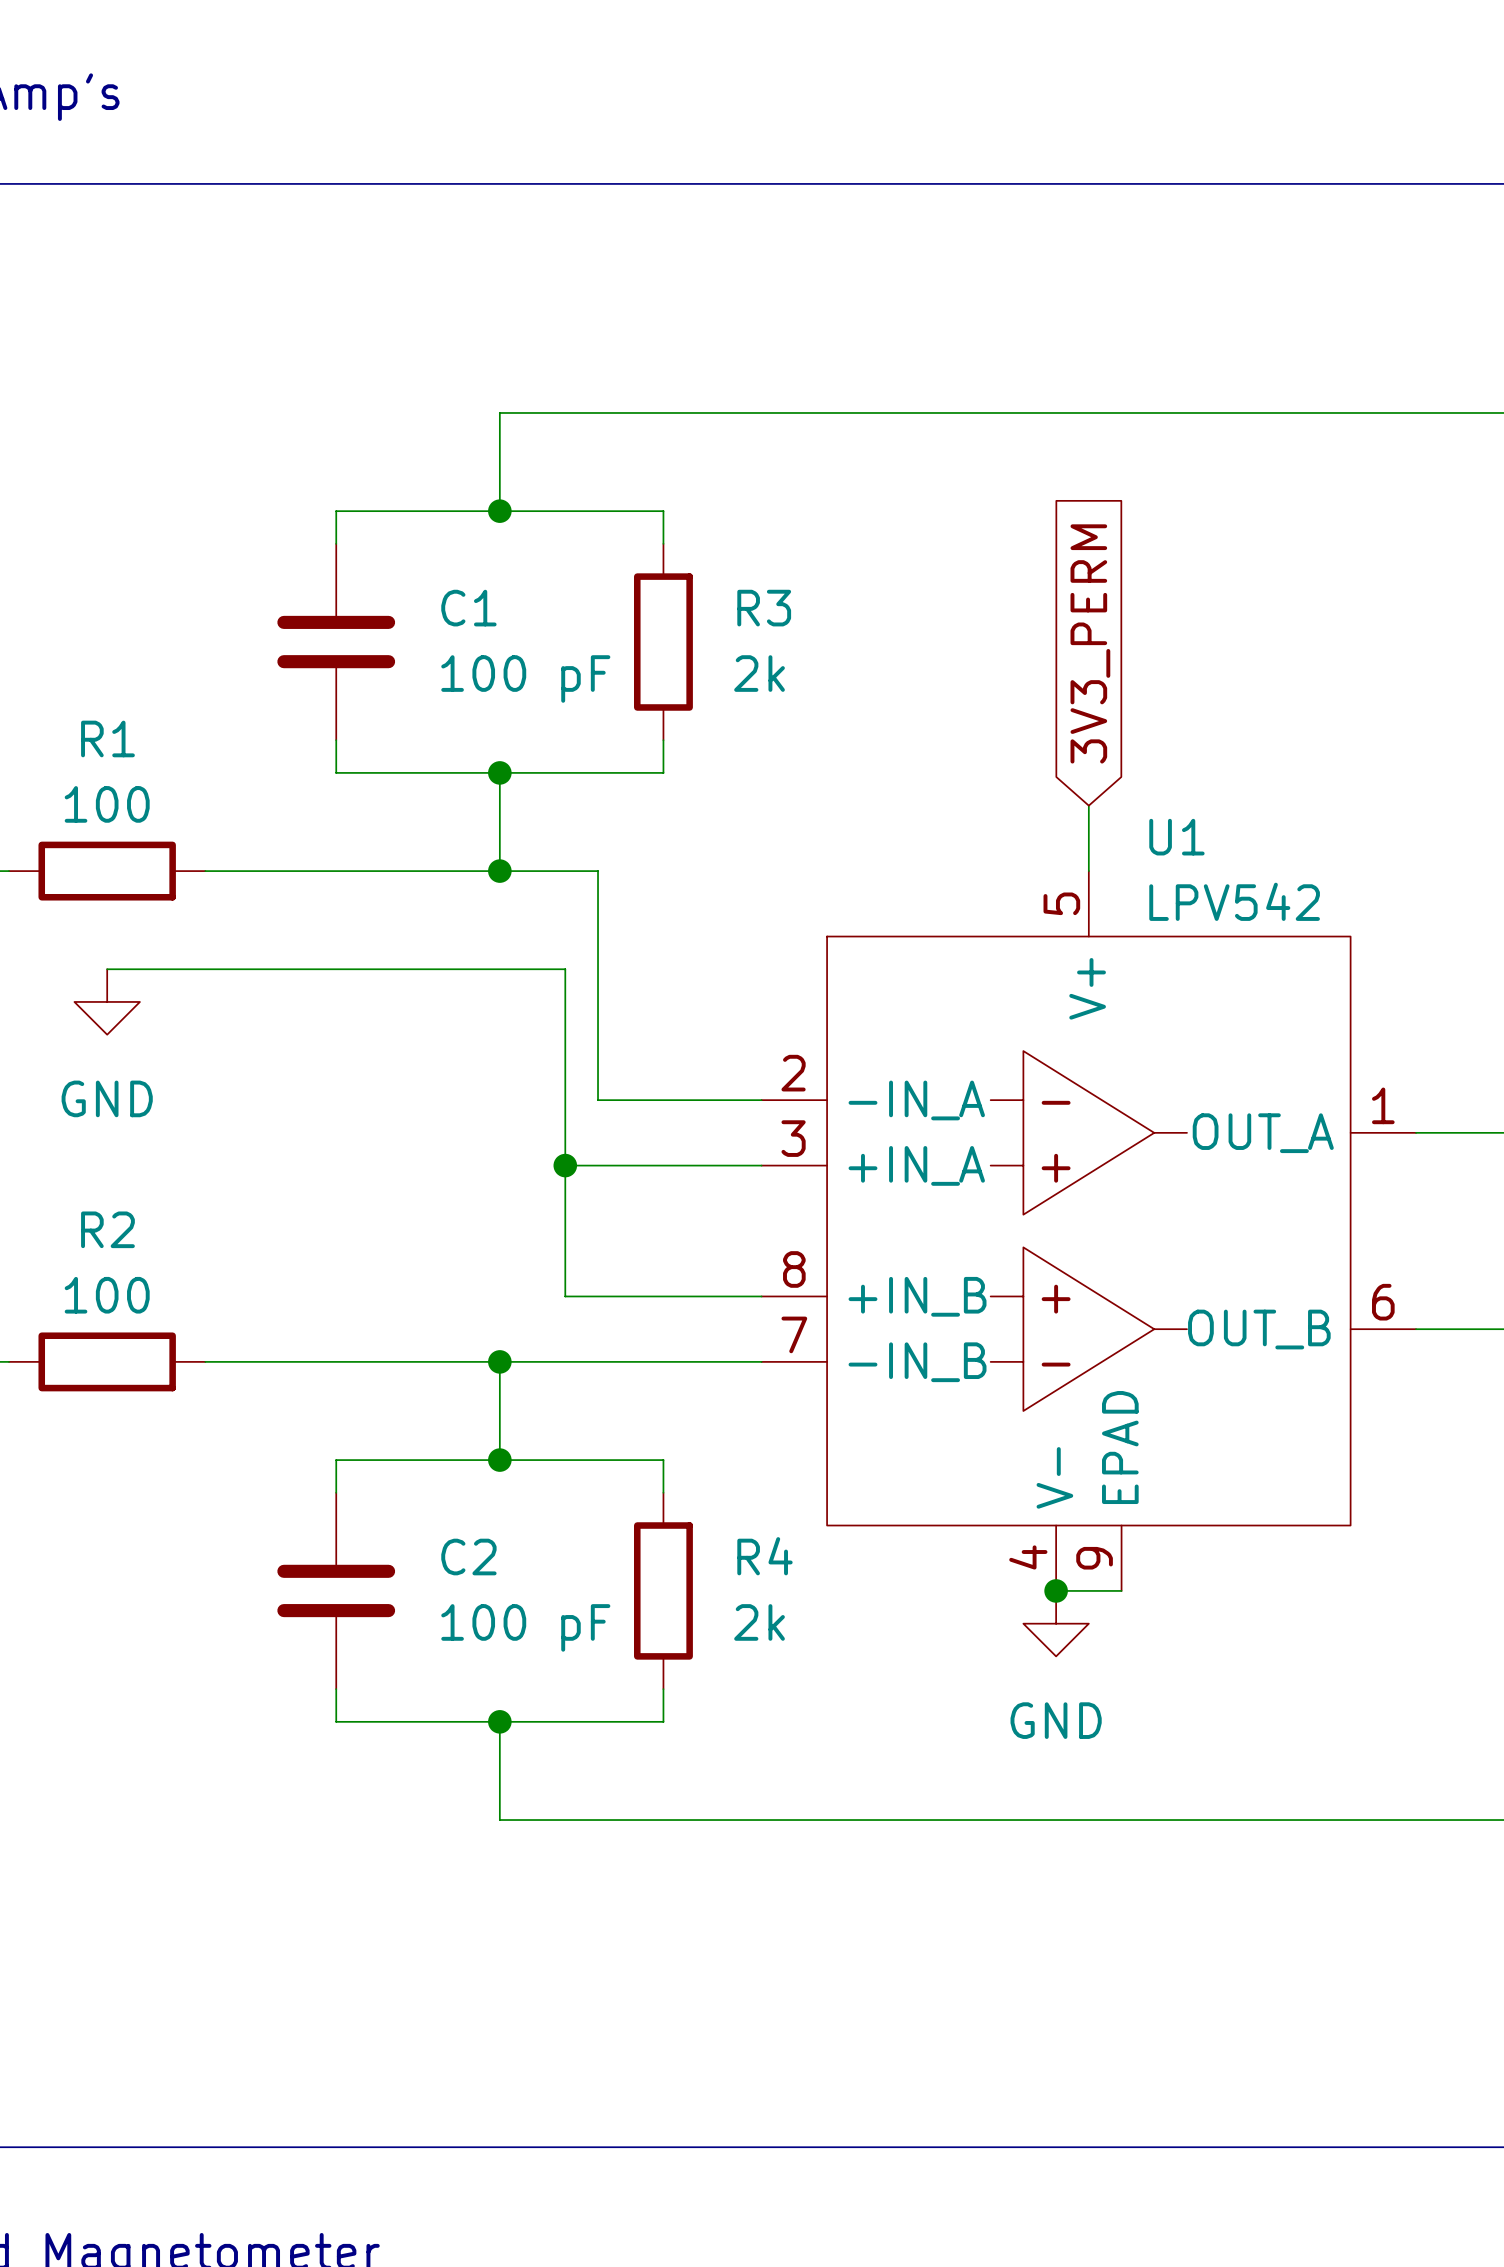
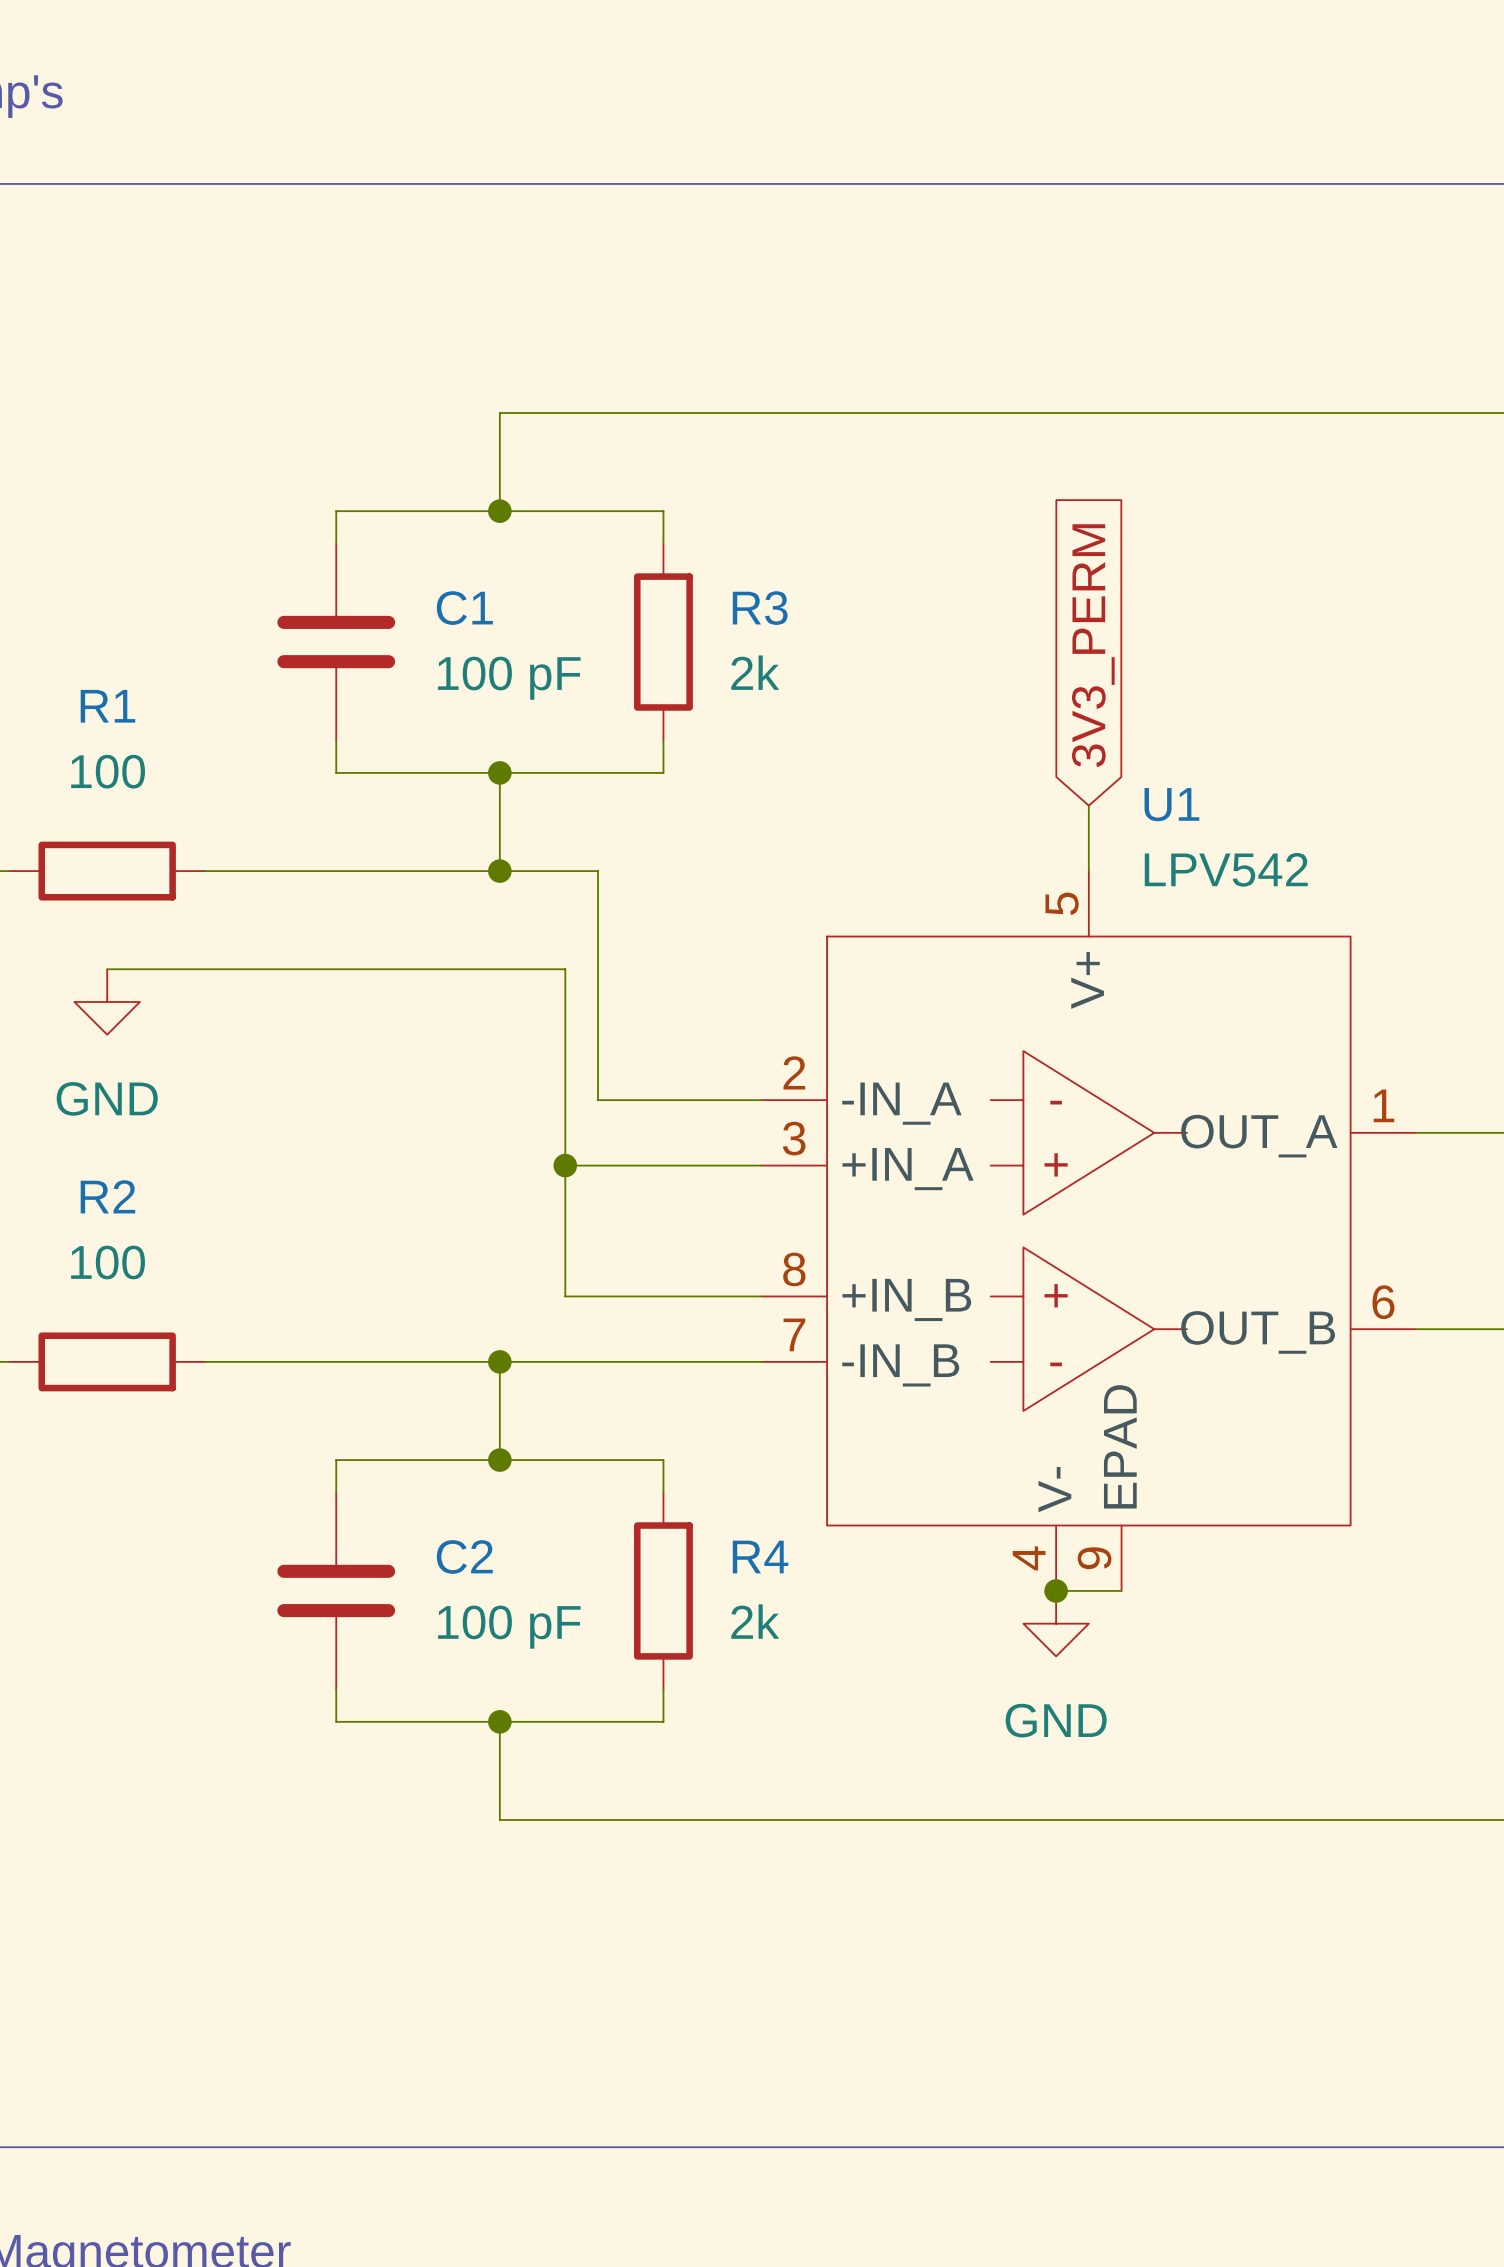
R1 name position: R1 (107, 738) -> R1 (107, 706)
R1 value position: 100 (107, 804) -> 100 (108, 771)
U1 name position: U1 (1176, 837) -> U1 (1171, 804)
U1 value position: LPV542 (1234, 901) -> LPV542 (1226, 869)
R2 name position: R2 (107, 1229) -> R2 (107, 1196)
R2 value position: 100 (107, 1295) -> 100 (108, 1262)

